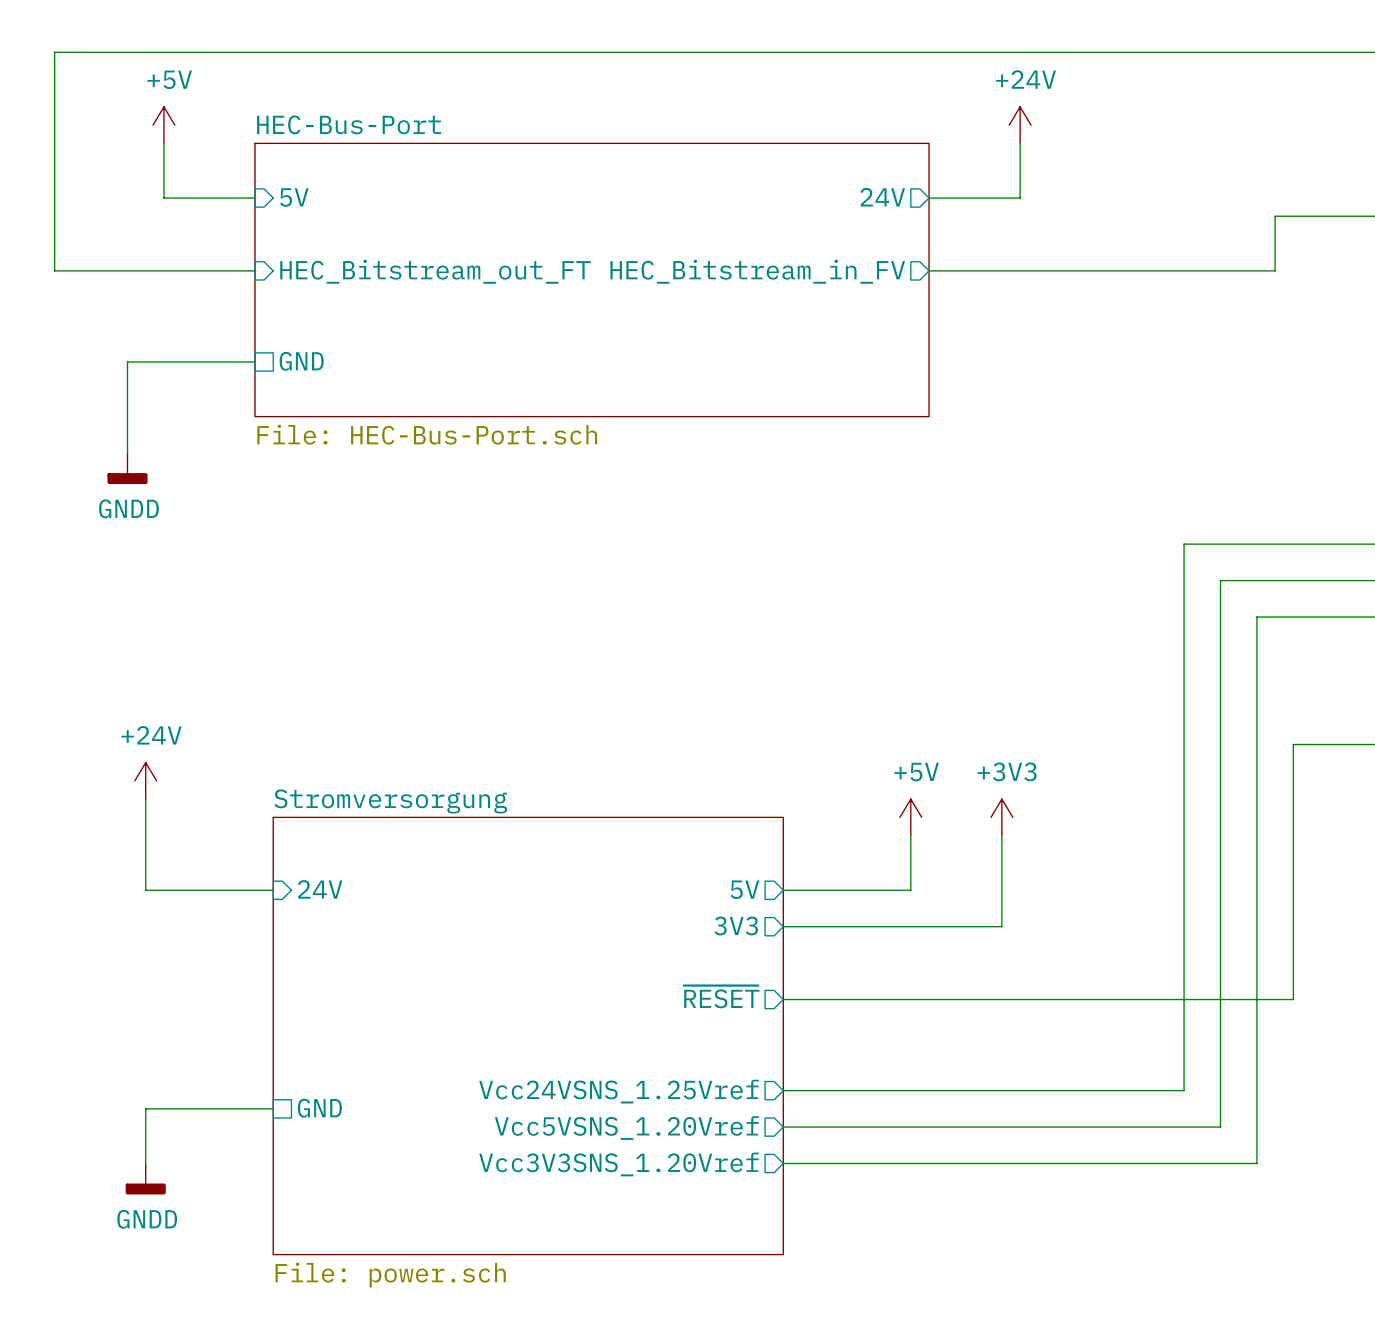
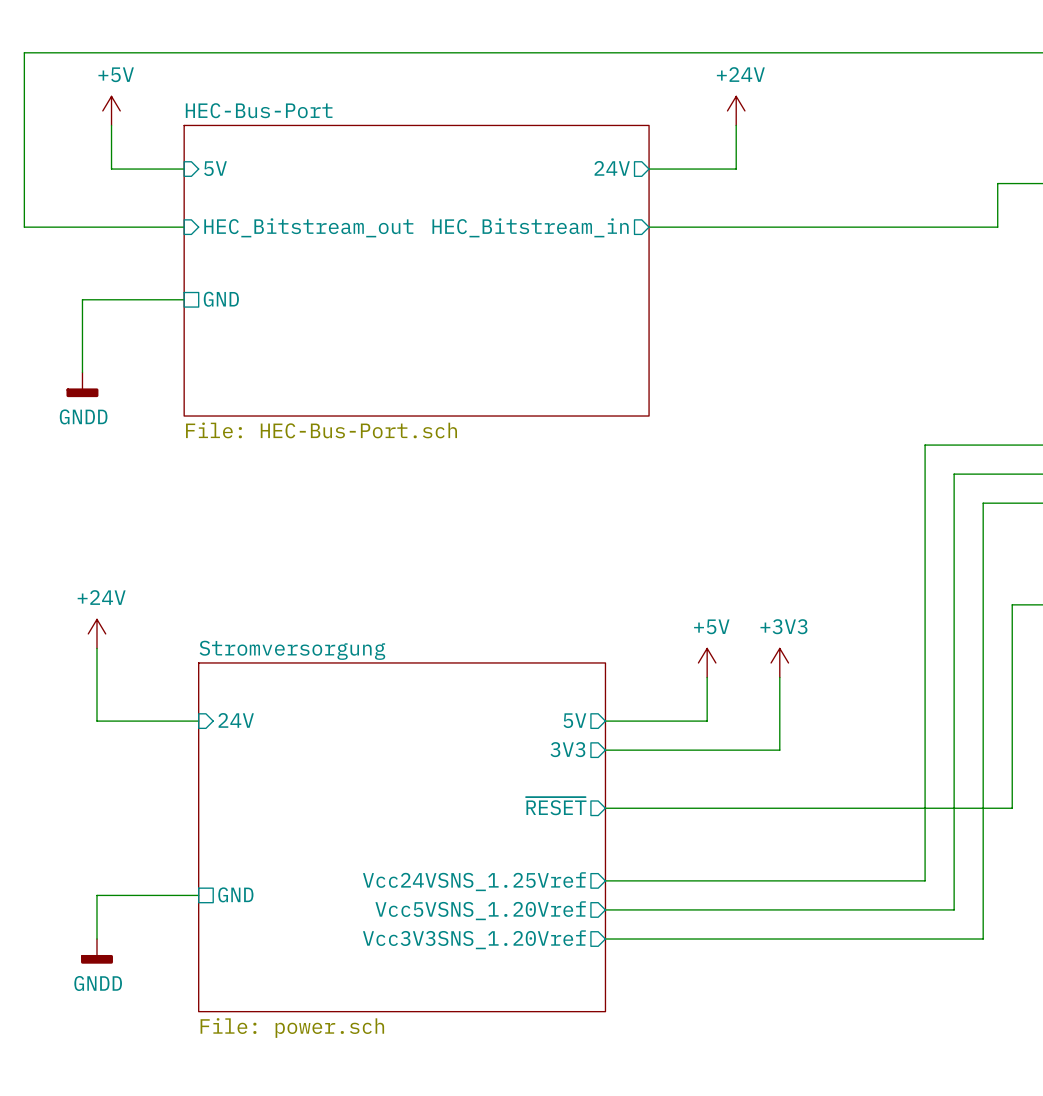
power symbol position: +24V (1020, 125) -> +24V (736, 110)
wire: (1020, 143) (1020, 198) (947, 198) -> (736, 125) (736, 169)
sheet pin position: 24V (882, 197) -> 24V (612, 168)
wire: none -> (649, 169) (721, 169)
wire: none -> (649, 227) (721, 227)
sheet pin: HEC_Bitstream_out_FT (435, 271) -> HEC_Bitstream_out (308, 227)
sheet pin: HEC_Bitstream_in_FV (757, 271) -> HEC_Bitstream_in (530, 227)
sheet HEC-Bus-Port: File: HEC-Bus-Port.sch (592, 280) -> none
sheet HEC-Bus-Port: none -> File: HEC-Bus-Port.sch (416, 270)

